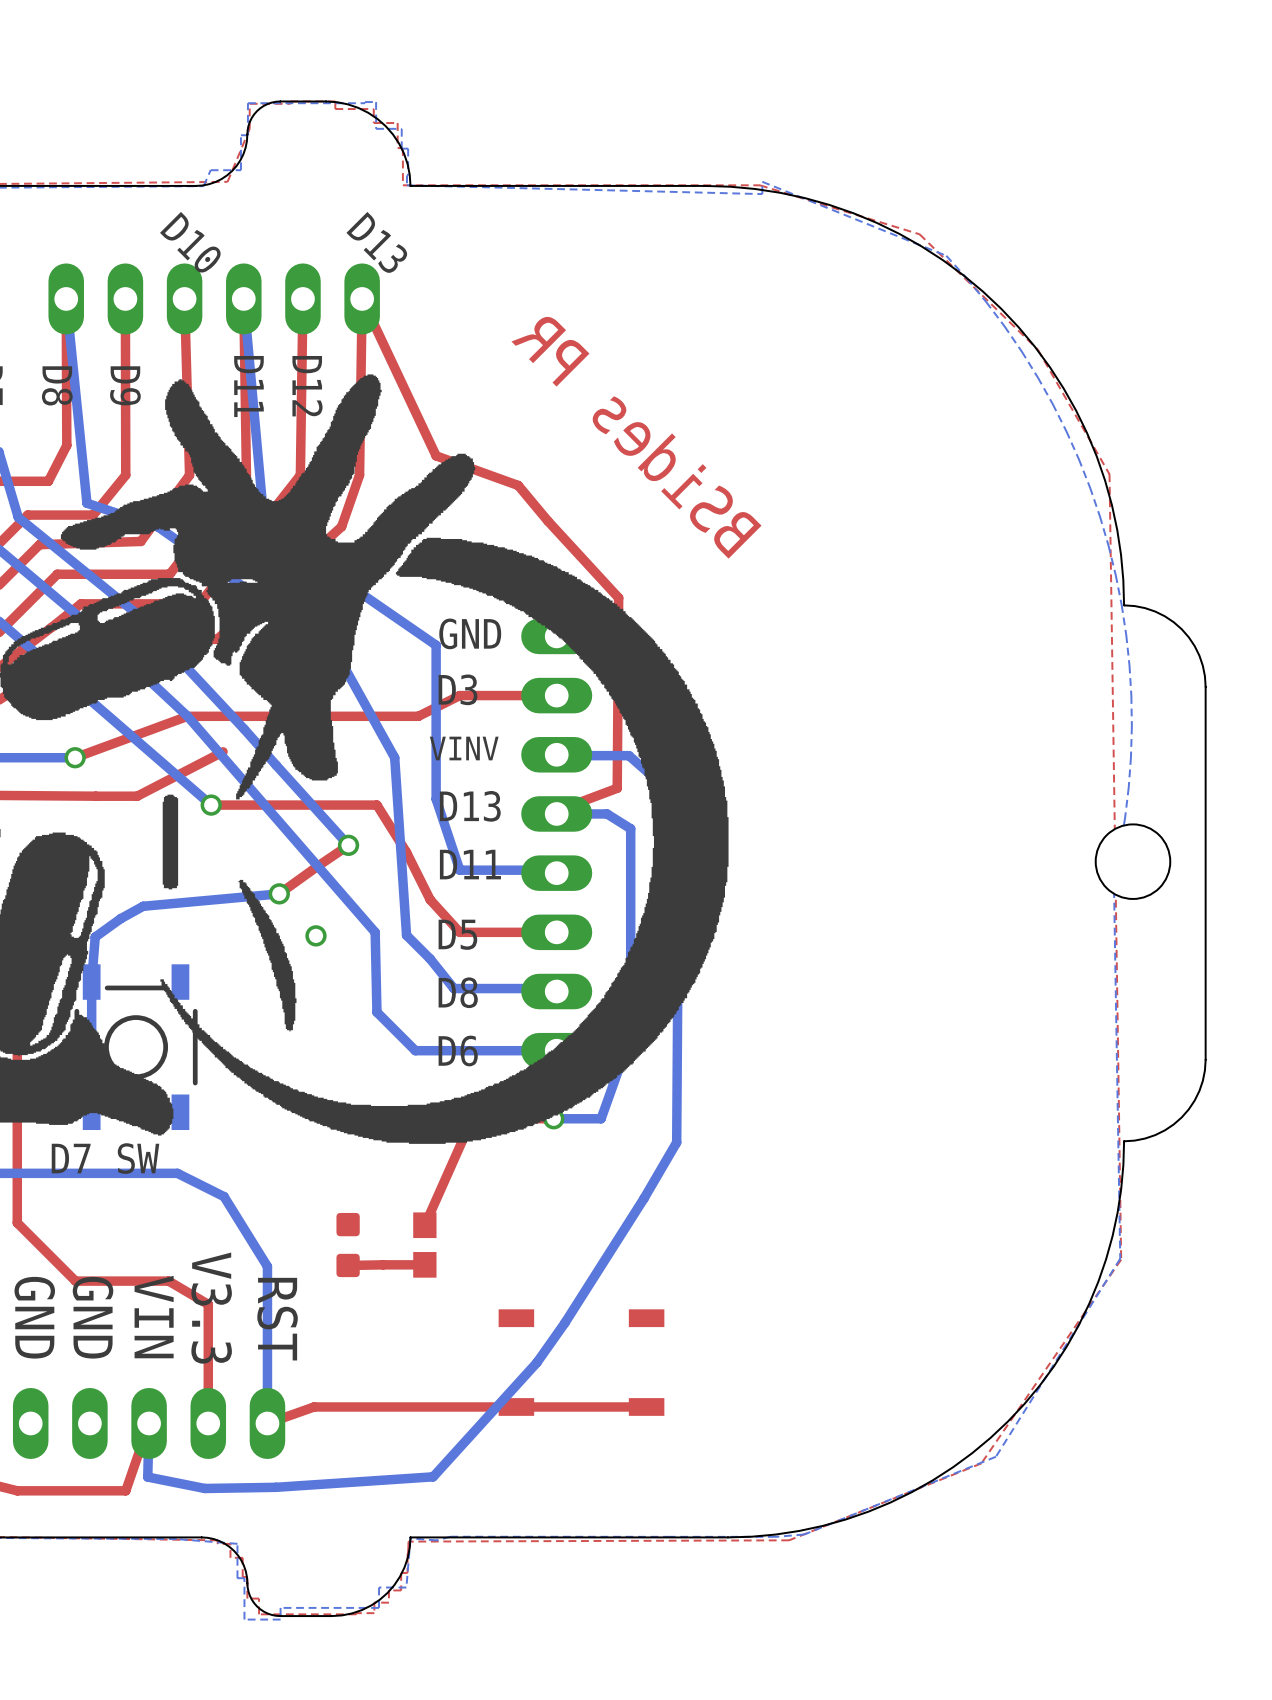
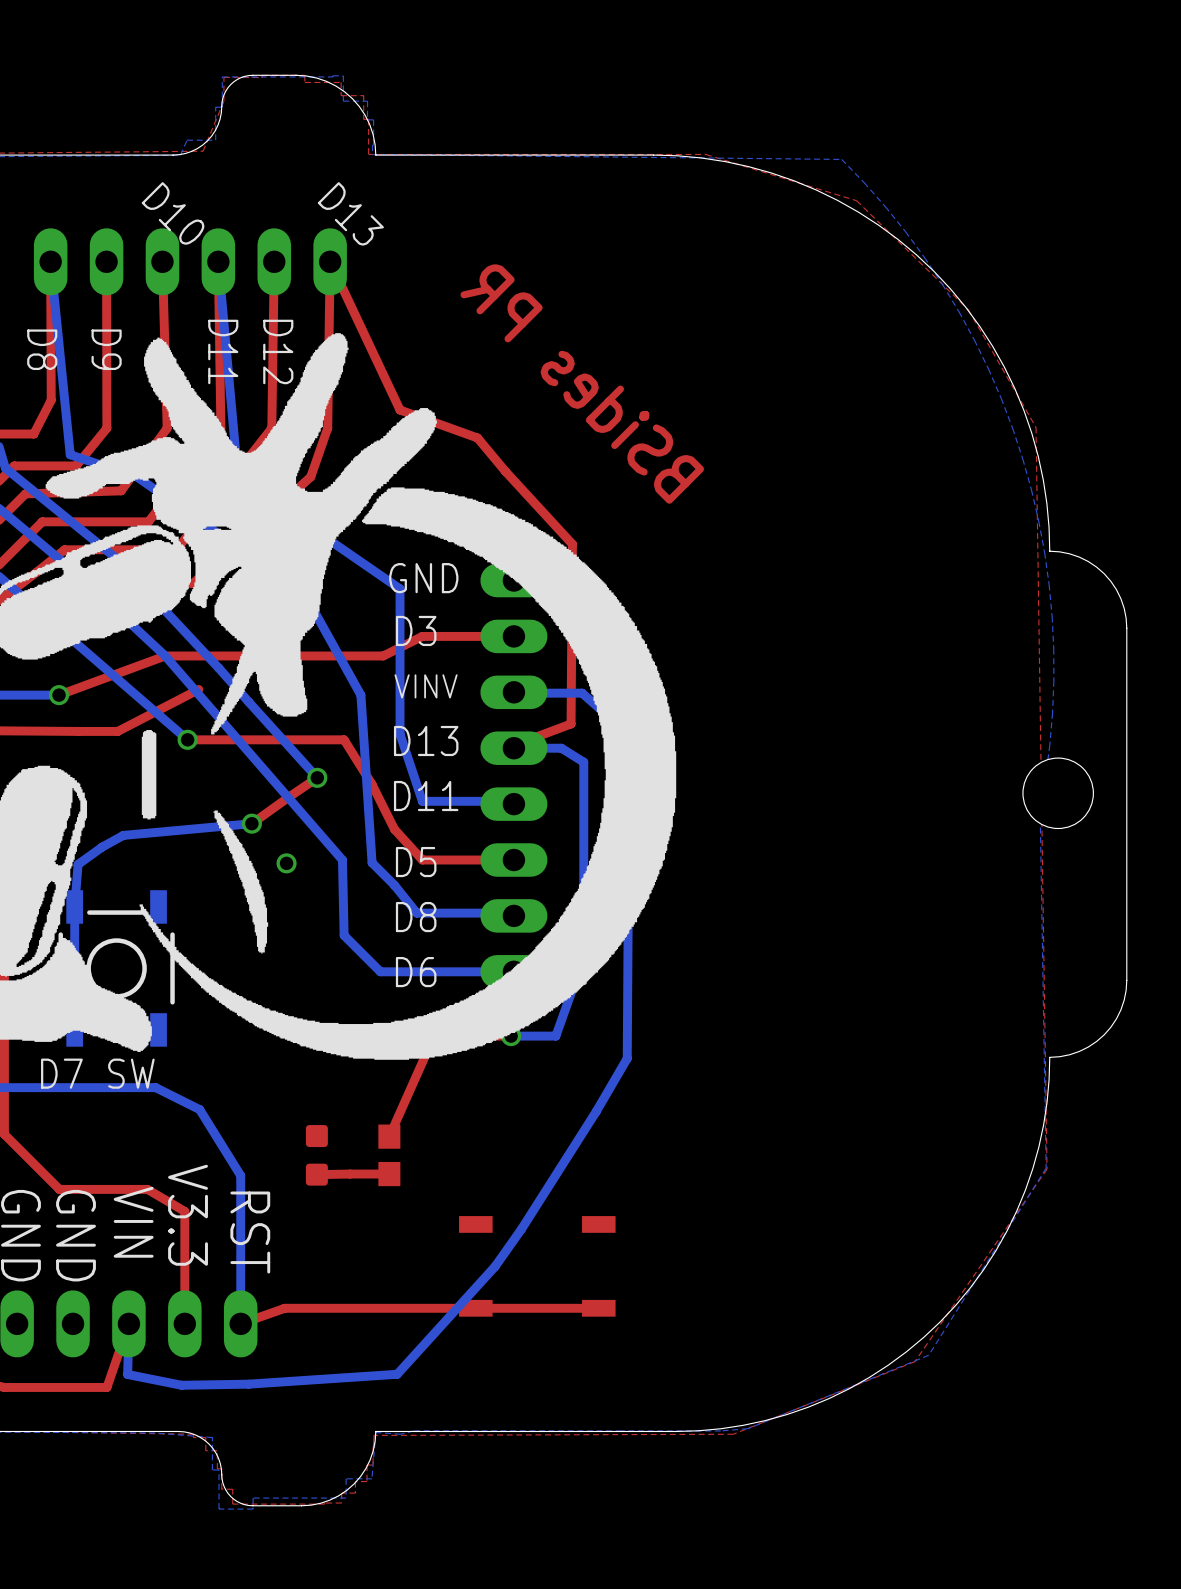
bottom zone outline: (406, 185) (762, 194) (762, 181) (946, 255) (1004, 326) (1037, 377) (1078, 459) (1108, 545) (1121, 605) (1131, 696) (1128, 787) (1113, 877) -> (372, 154) (841, 159) (885, 206) (942, 284) (988, 368) (1022, 458) (1044, 552) (1052, 616) (1052, 712) (1040, 808)

